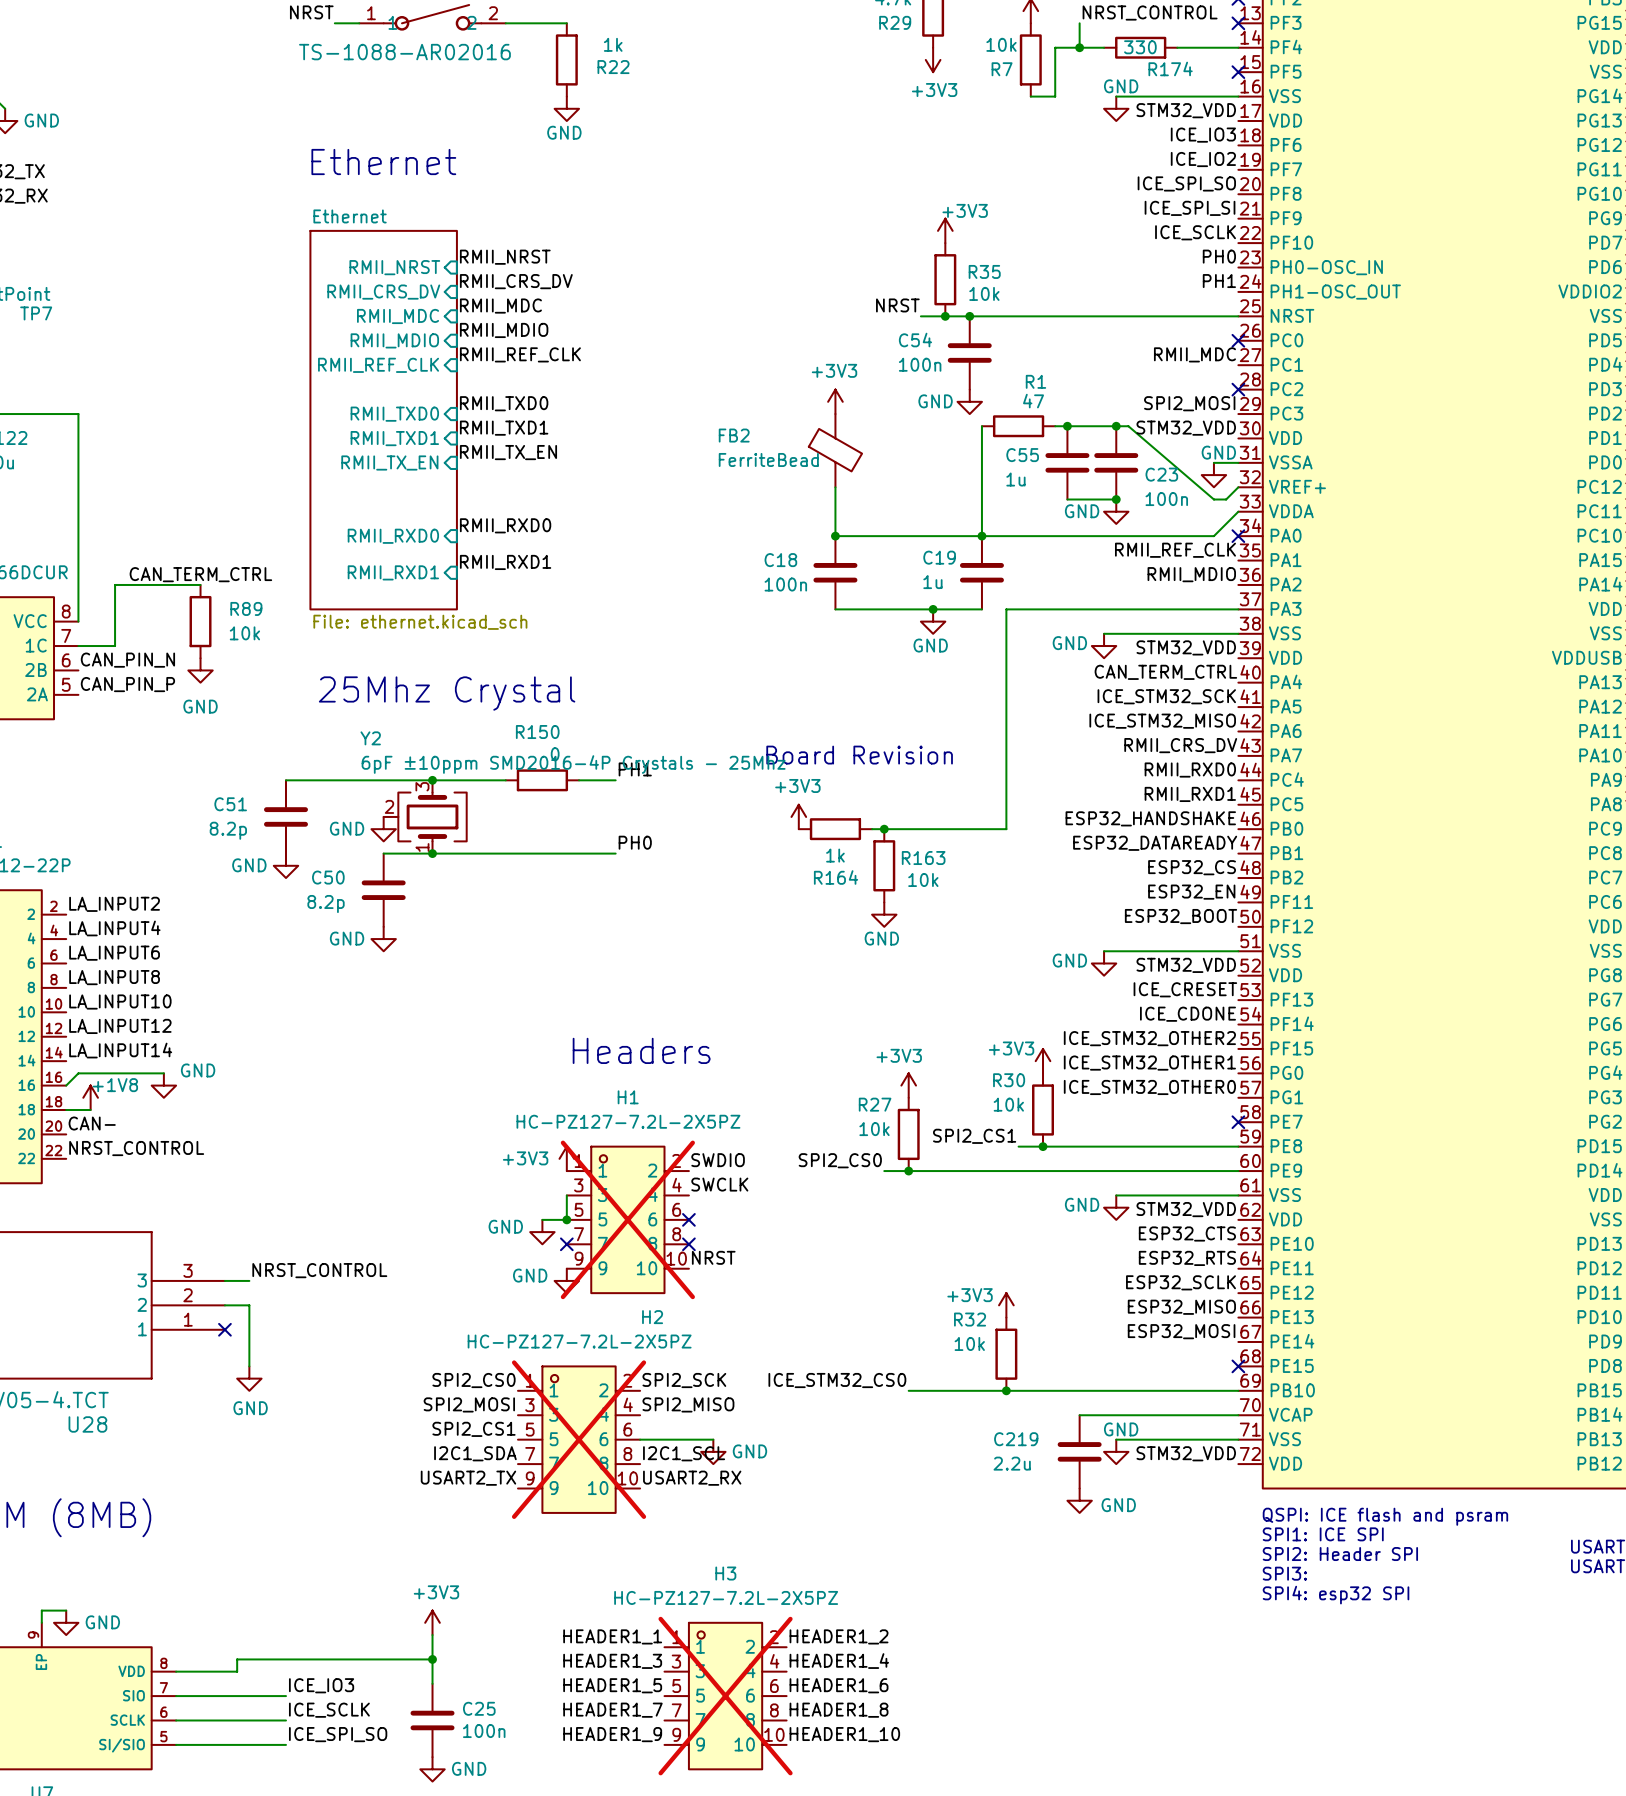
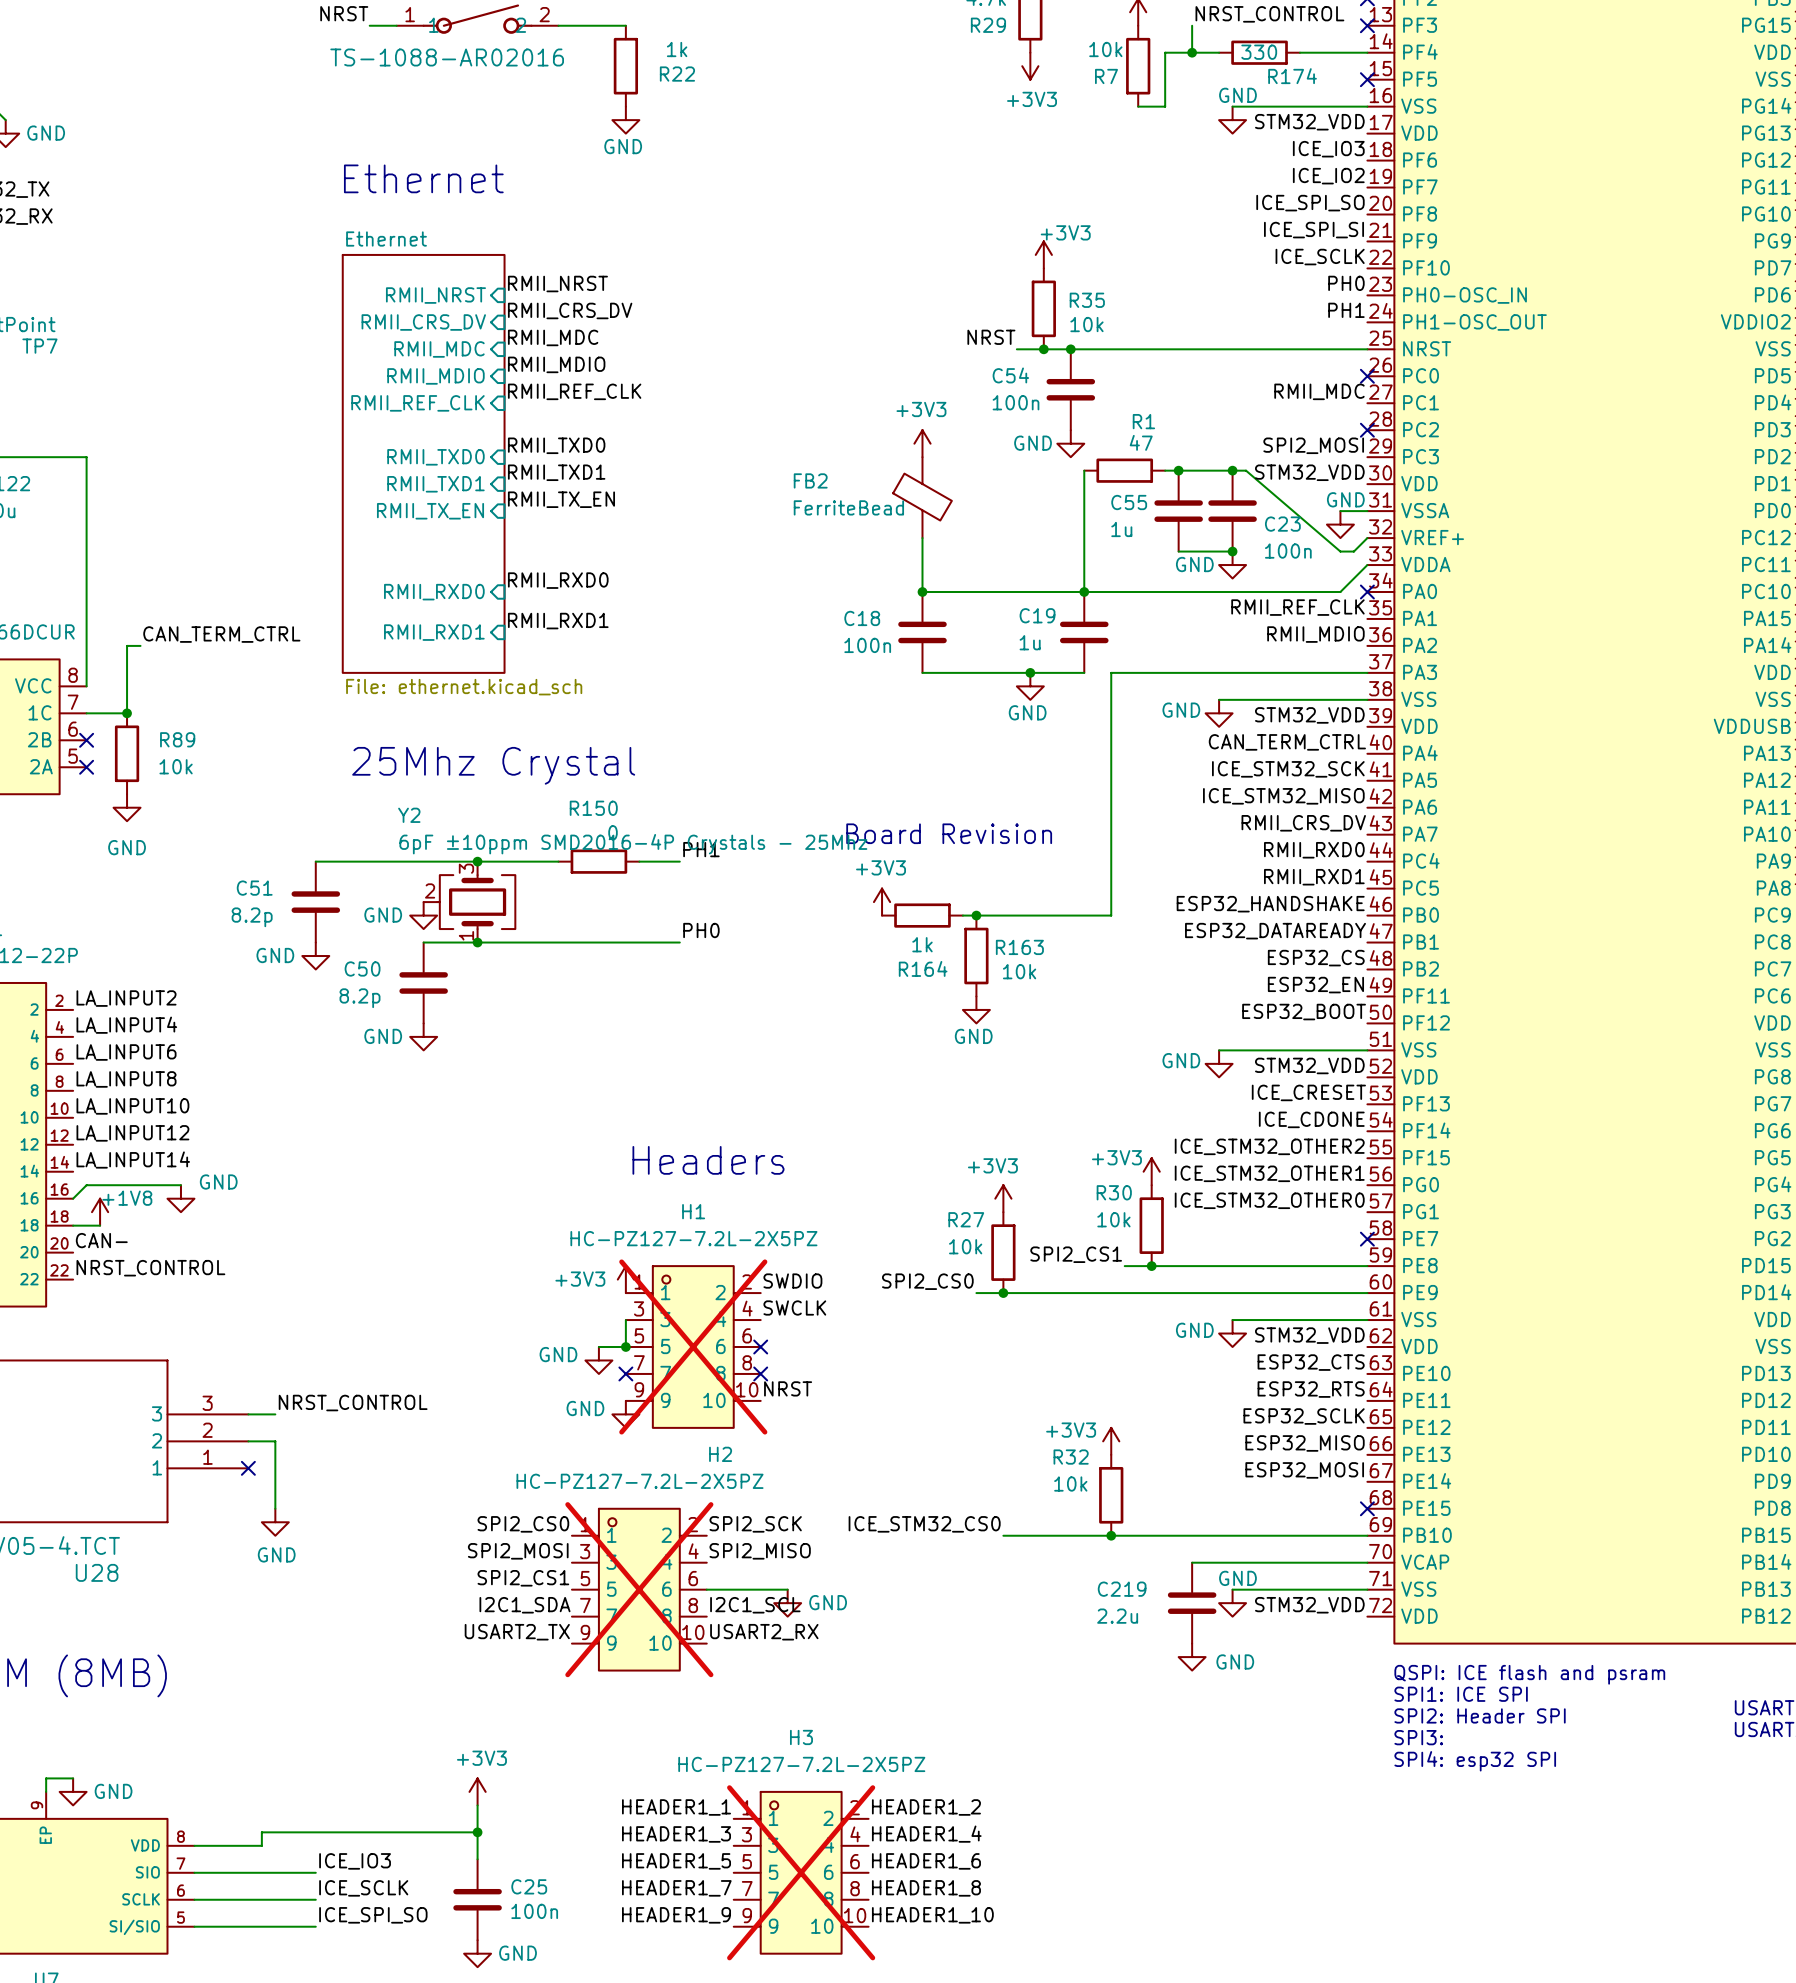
wire: (127, 584) (200, 584) -> none
R89 position: (200, 621) -> (127, 753)
junction: none -> (127, 713)
label: CAN_PIN_N (127, 660) -> none
no-connect mark: none -> (86, 740)
power symbol position: GND (200, 670) -> GND (127, 807)
label: CAN_PIN_P (127, 684) -> none
no-connect mark: none -> (86, 767)

